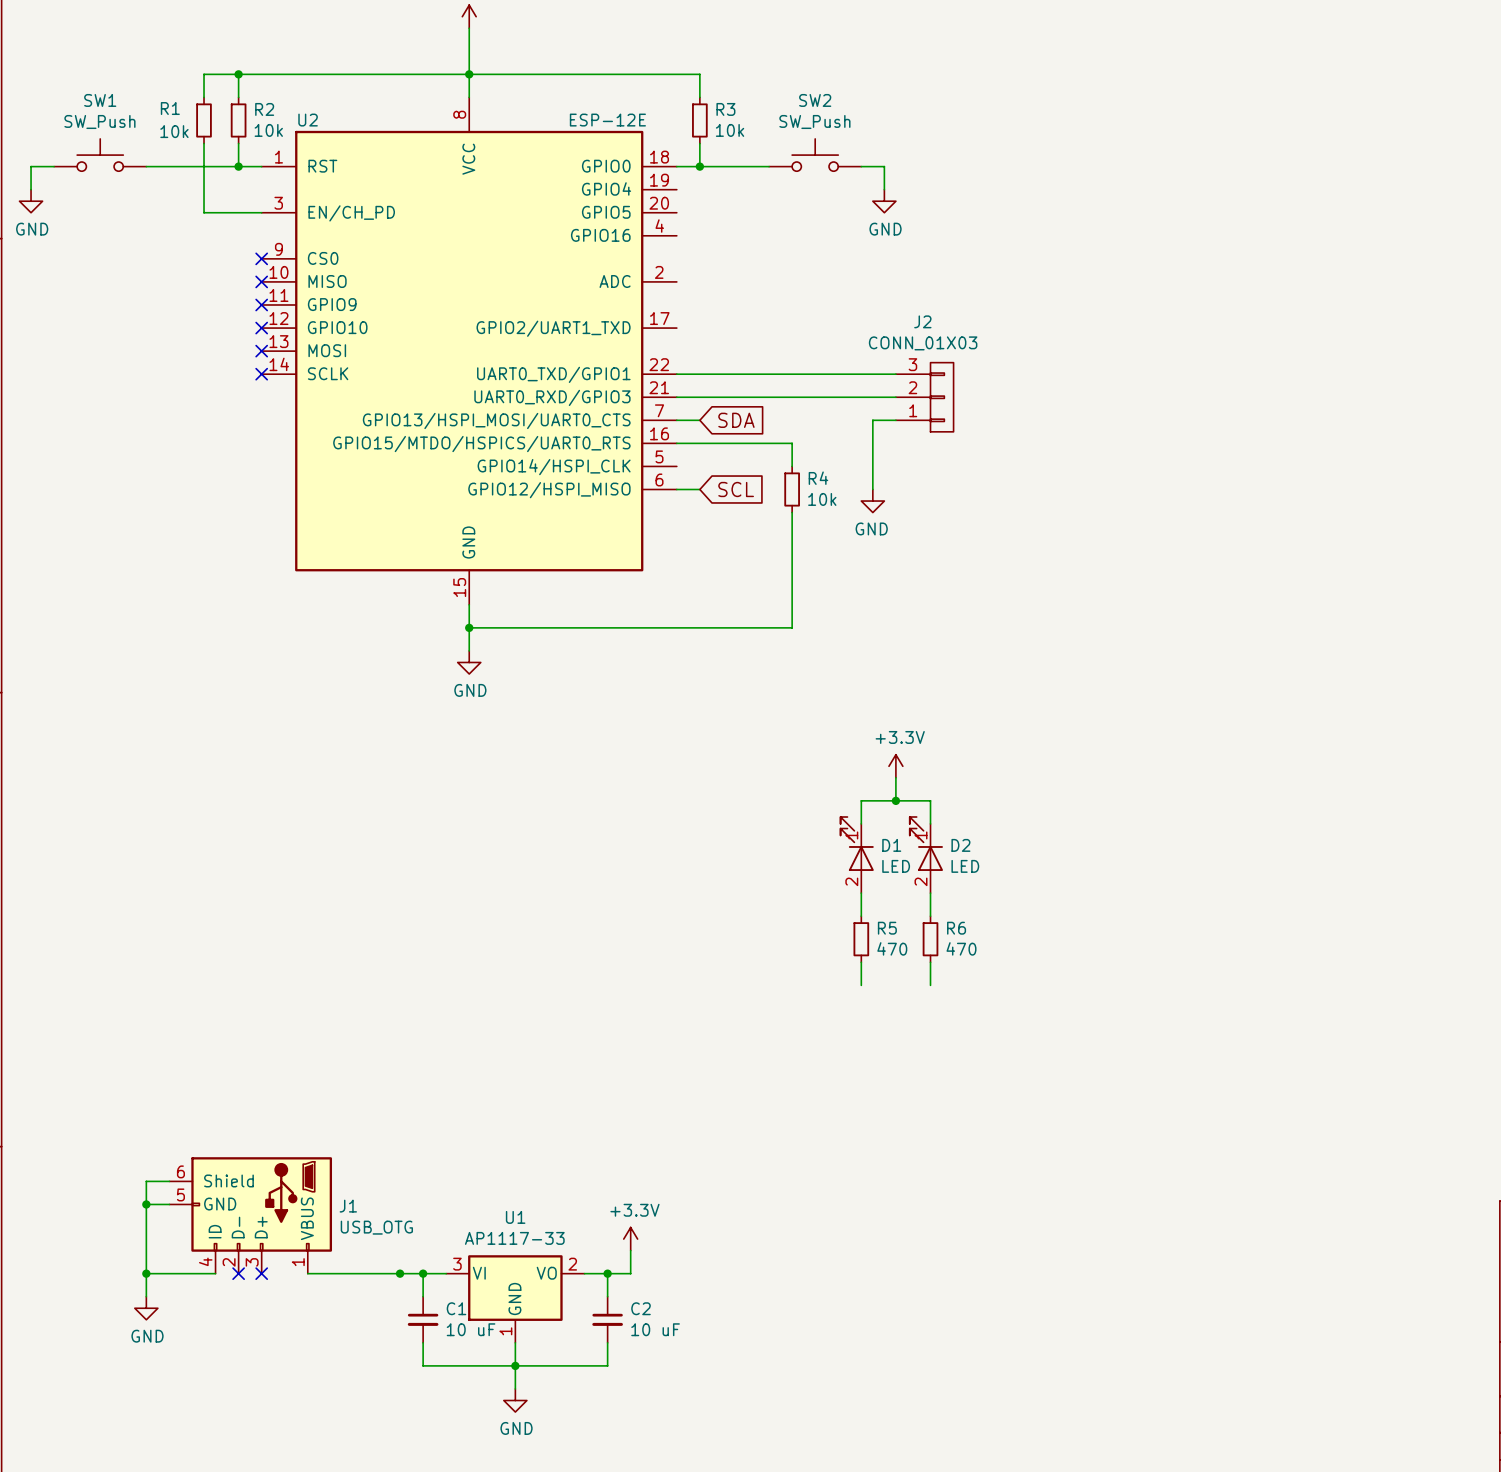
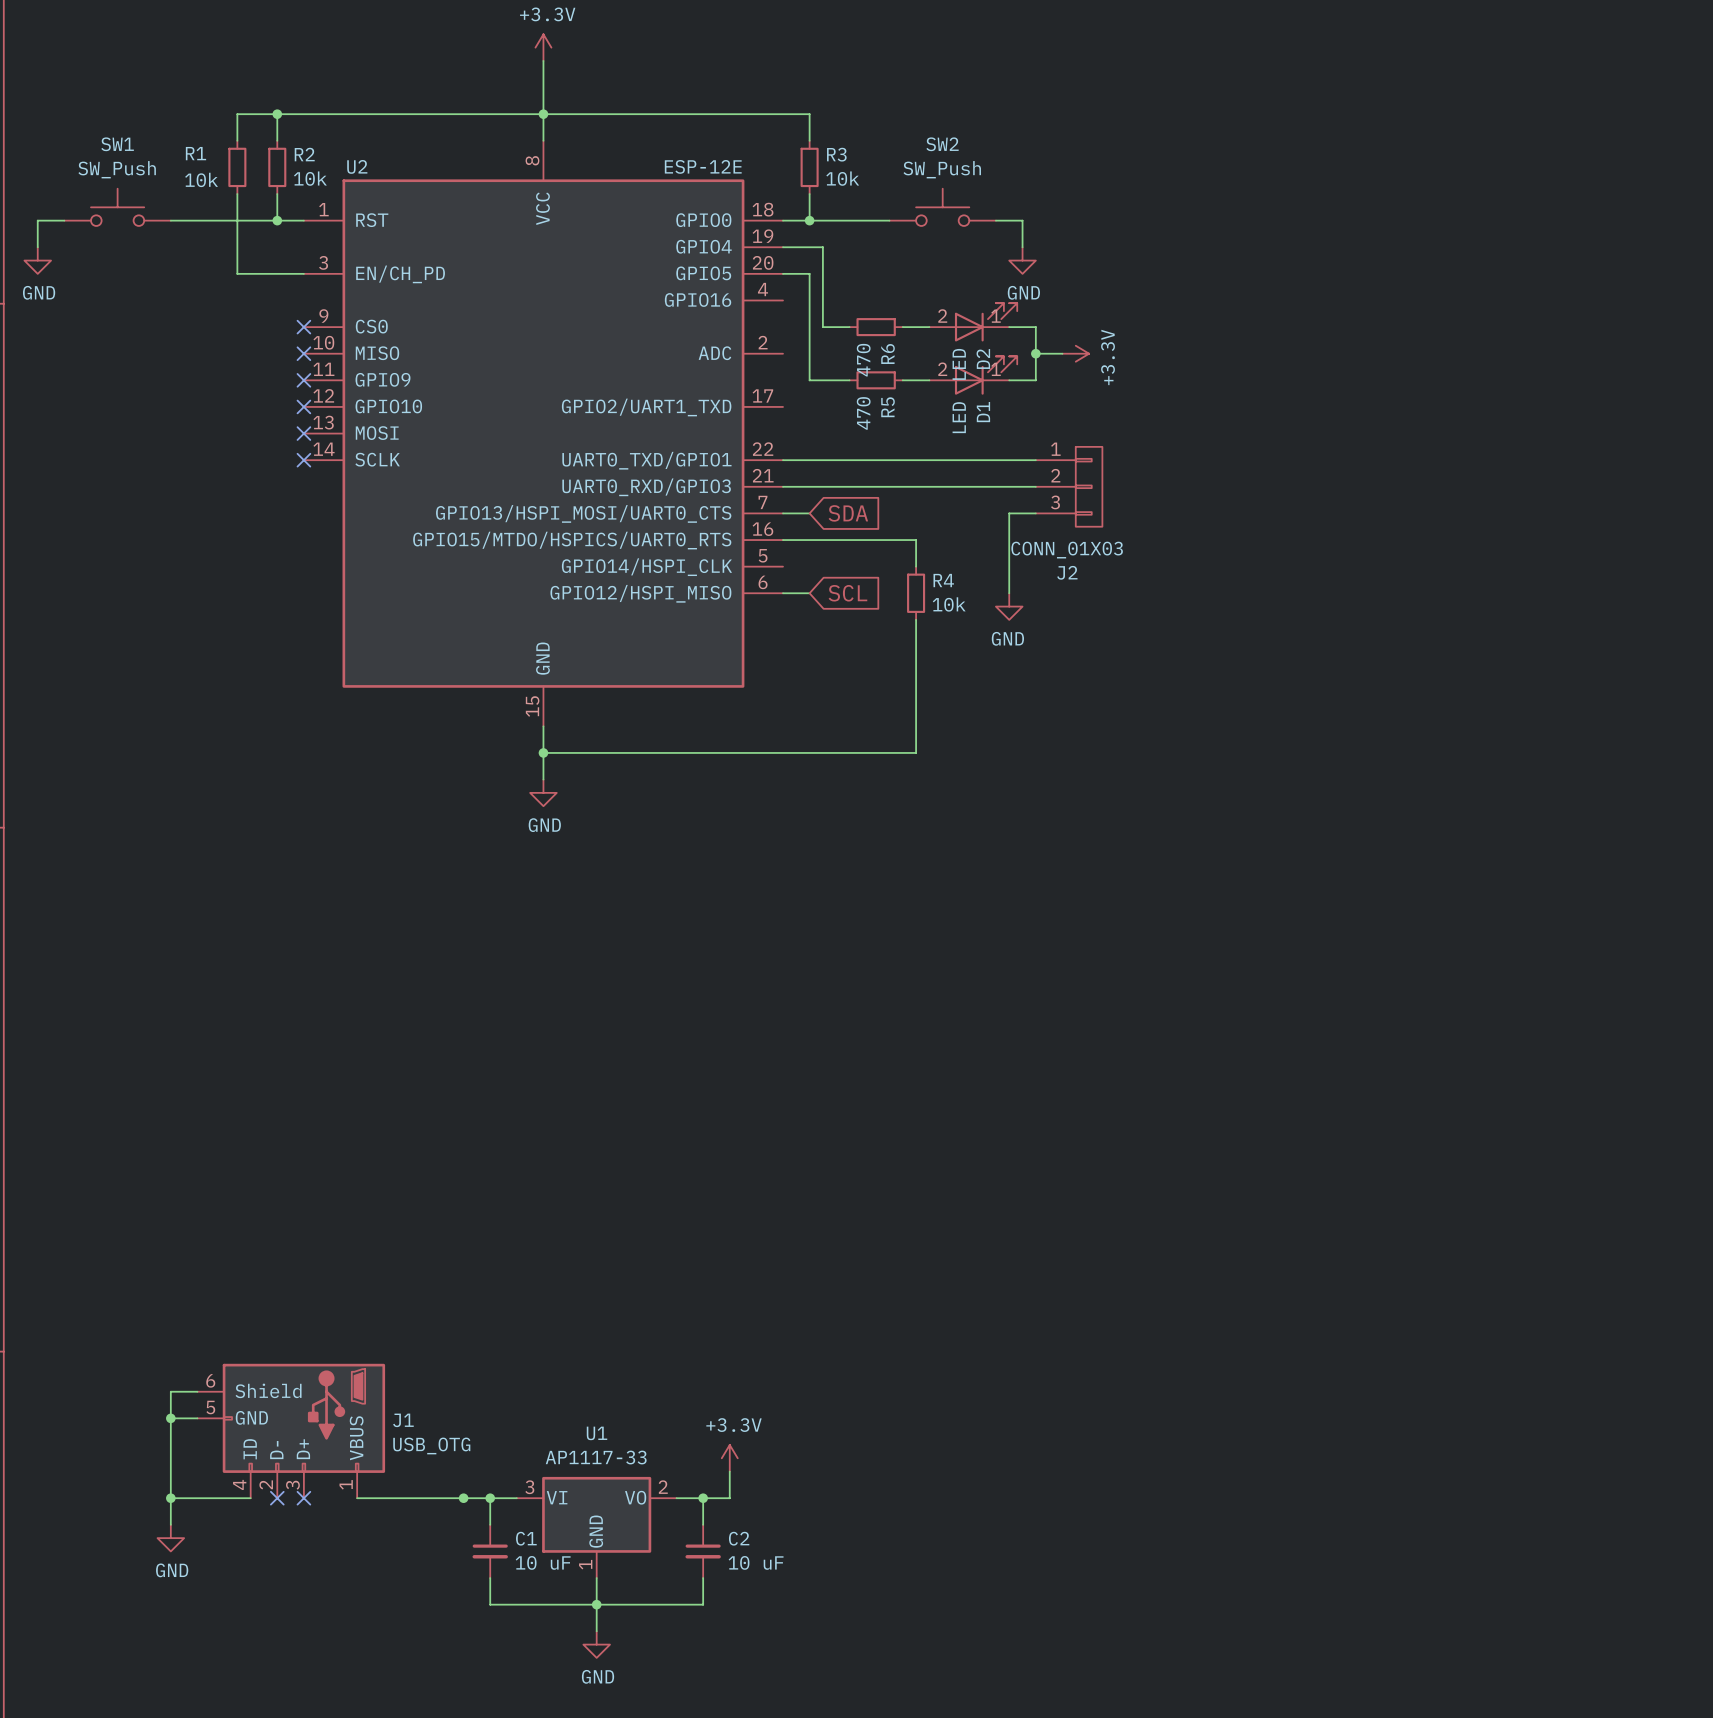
wire: none -> (783, 247) (822, 247) (822, 327) (849, 327)
wire: none -> (783, 273) (809, 273) (809, 380) (849, 380)
wire: none -> (902, 327) (929, 327)
wire: none -> (1009, 327) (1035, 327) (1035, 380) (1009, 380)
wire: none -> (1035, 353) (1062, 353)
junction: none -> (1035, 353)
power symbol: none -> +3.3V (1075, 353)
wire: none -> (902, 380) (929, 380)
J2 flip: as is (942, 397) -> up-down (1089, 486)
power symbol: +3.3V (895, 766) -> none
wire: (895, 777) (895, 800) -> none
junction: (895, 800) -> none
wire: (861, 823) (861, 800) (930, 800) (930, 823) -> none
D1 rotation: 0° (857, 843) -> 90° clockwise (986, 375)
D2 rotation: 0° (926, 843) -> 90° clockwise (986, 322)
D1 position: (857, 855) -> (973, 375)
D2 position: (926, 855) -> (973, 322)
wire: (861, 893) (861, 916) -> none
wire: (930, 893) (930, 916) -> none
R5 rotation: 0° (861, 939) -> 90° clockwise (876, 380)
R5 position: (861, 939) -> (876, 380)
R6 rotation: 0° (930, 939) -> 90° clockwise (876, 327)
R6 position: (930, 939) -> (876, 327)
wire: (861, 962) (861, 985) -> none
wire: (930, 962) (930, 985) -> none

